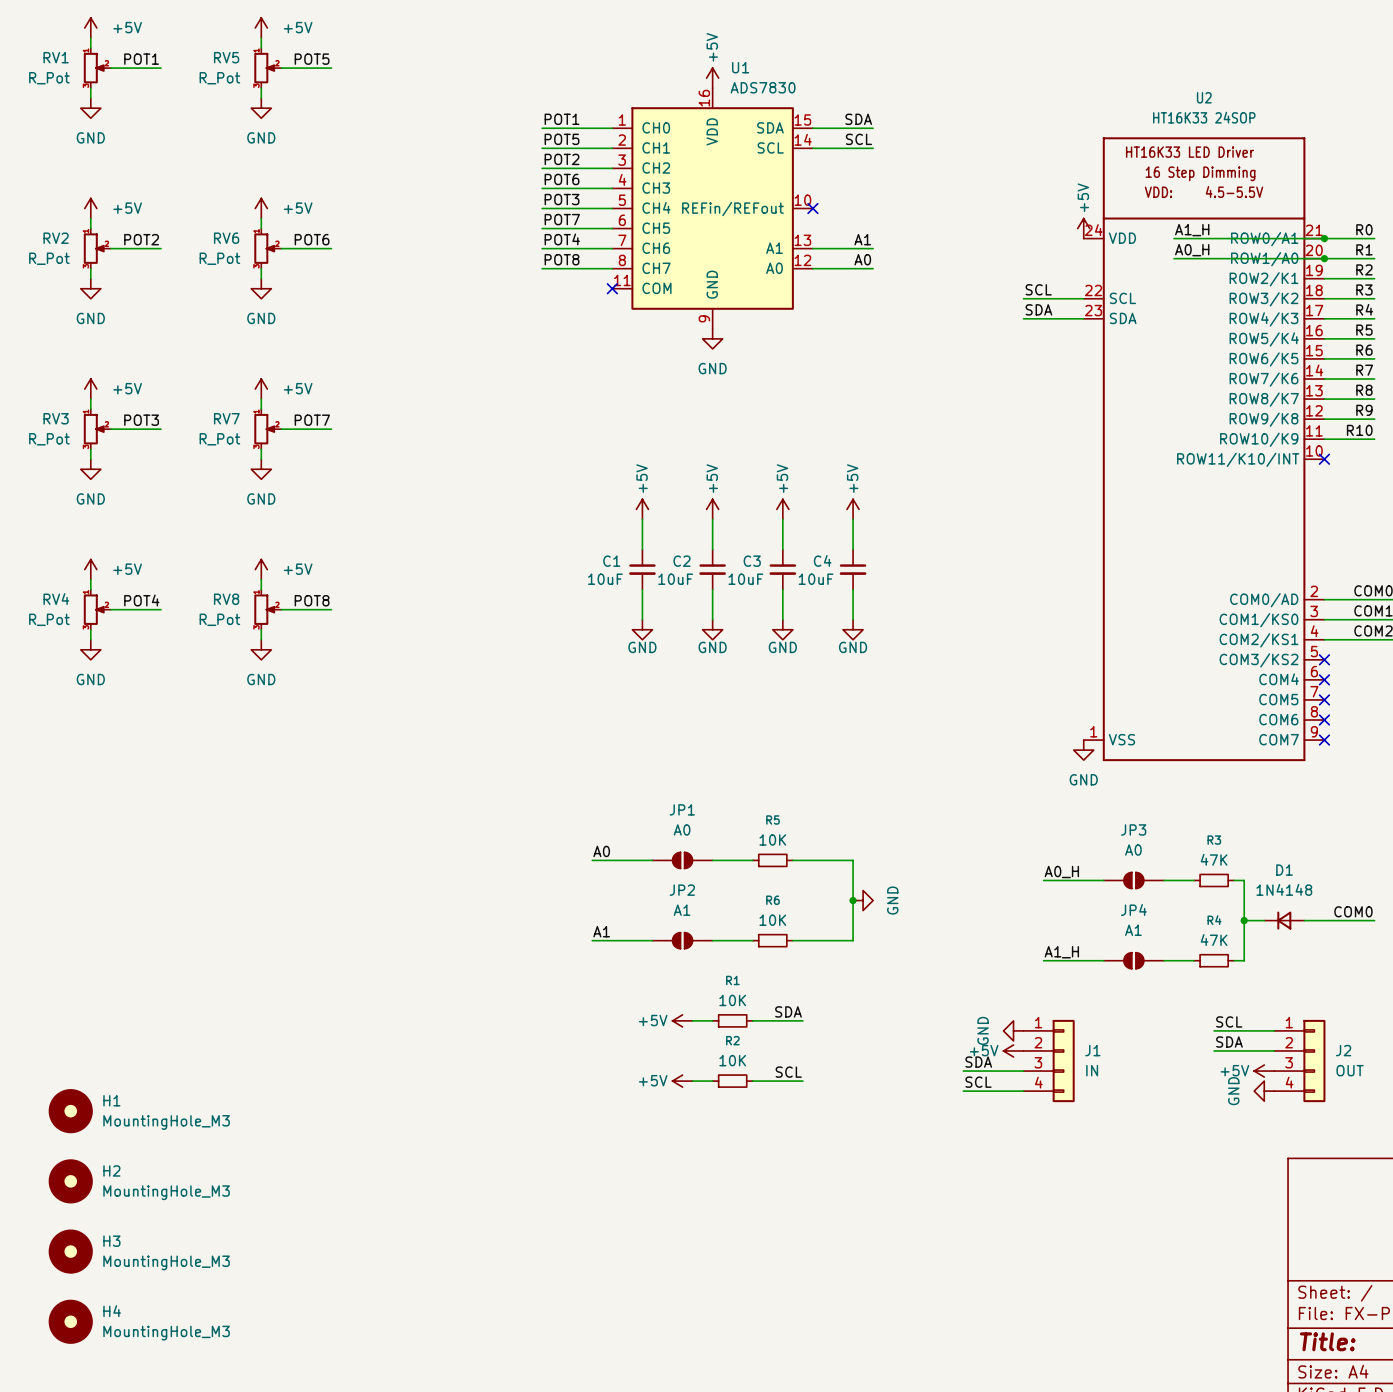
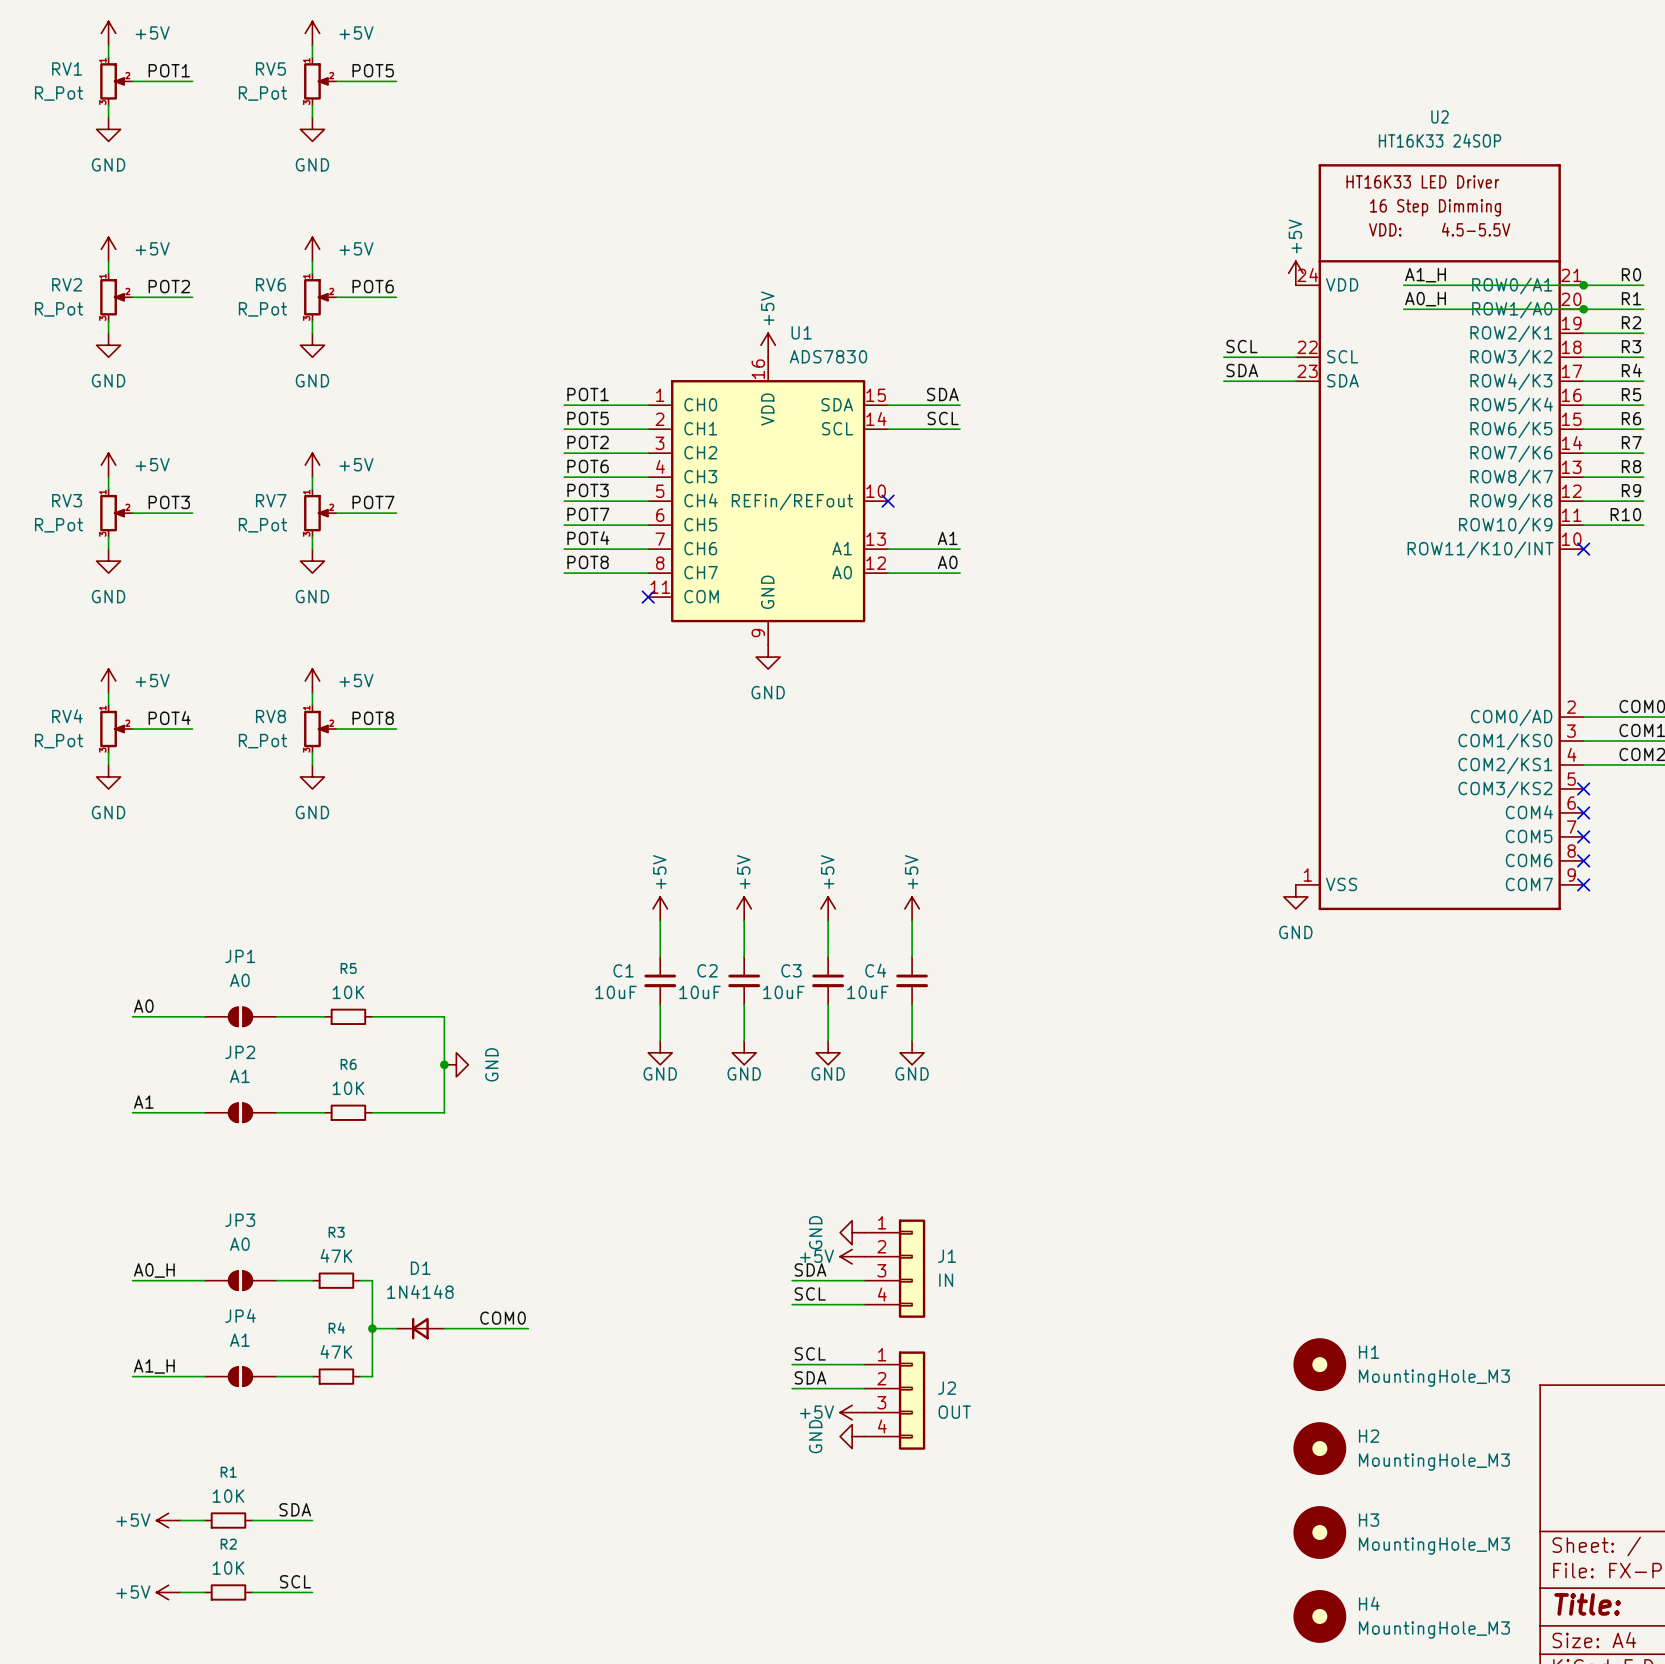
power symbol: +5V (712, 78) -> none
label: POT1 (562, 119) -> none
label: SDA (858, 119) -> none
wire: (542, 128) (612, 128) -> none
wire: (812, 128) (873, 128) -> none
label: POT5 (562, 139) -> none
label: SCL (858, 139) -> none
wire: (542, 148) (612, 148) -> none
wire: (812, 148) (873, 148) -> none
label: POT2 (562, 159) -> none
wire: (542, 168) (612, 168) -> (564, 405) (648, 405)
label: POT6 (562, 179) -> none
wire: (542, 188) (612, 188) -> (564, 429) (648, 429)
label: POT3 (562, 199) -> none
wire: (542, 208) (612, 208) -> (564, 453) (648, 453)
U1 position: (712, 208) -> (768, 501)
no-connect mark: (812, 208) -> none
label: POT7 (562, 219) -> none
wire: (542, 228) (612, 228) -> (564, 477) (648, 477)
label: POT4 (562, 239) -> none
label: A1 (862, 239) -> none
wire: (542, 248) (612, 248) -> (564, 501) (648, 501)
wire: (812, 248) (873, 248) -> (888, 405) (960, 405)
label: POT8 (562, 259) -> none
label: A0 (862, 259) -> none
wire: (542, 268) (612, 268) -> (564, 525) (648, 525)
wire: (812, 268) (873, 268) -> (888, 429) (960, 429)
no-connect mark: (612, 288) -> none
power symbol: none -> +5V (768, 345)
label: none -> POT1 (588, 394)
label: none -> SDA (942, 394)
power symbol: GND (712, 338) -> none
label: none -> POT5 (588, 418)
label: none -> SCL (943, 418)
label: none -> POT2 (588, 442)
label: none -> POT6 (588, 466)
label: none -> POT3 (588, 490)
no-connect mark: none -> (888, 501)
label: none -> POT7 (588, 514)
label: none -> POT4 (588, 538)
label: none -> A1 (947, 538)
wire: none -> (564, 549) (648, 549)
wire: none -> (888, 549) (960, 549)
label: none -> POT8 (588, 562)
label: none -> A0 (947, 562)
wire: none -> (564, 573) (648, 573)
wire: none -> (888, 573) (960, 573)
no-connect mark: none -> (648, 597)
power symbol: +5V (642, 509) -> none
power symbol: +5V (712, 509) -> none
power symbol: +5V (782, 509) -> none
power symbol: +5V (853, 509) -> none
wire: (712, 519) (712, 549) -> none
wire: (782, 519) (782, 549) -> none
wire: (853, 519) (853, 549) -> none
power symbol: none -> GND (768, 657)
C1 position: (642, 569) -> (660, 980)
C2 position: (712, 569) -> (744, 980)
C3 position: (782, 569) -> (828, 980)
C4 position: (853, 569) -> (912, 980)
wire: (642, 589) (642, 619) -> (744, 920) (744, 956)
wire: (712, 589) (712, 619) -> (828, 920) (828, 956)
wire: (782, 589) (782, 619) -> (912, 920) (912, 956)
wire: (853, 589) (853, 619) -> none
power symbol: GND (642, 629) -> none
power symbol: GND (712, 629) -> none
power symbol: GND (782, 629) -> none
power symbol: GND (853, 629) -> none
power symbol: none -> +5V (660, 908)
power symbol: none -> +5V (744, 908)
power symbol: none -> +5V (828, 908)
power symbol: none -> +5V (912, 908)
wire: none -> (660, 920) (660, 956)
wire: none -> (660, 1004) (660, 1040)
wire: none -> (744, 1004) (744, 1040)
wire: none -> (828, 1004) (828, 1040)
wire: none -> (912, 1004) (912, 1040)
label: none -> A0 (143, 1006)
wire: none -> (132, 1016) (204, 1016)
wire: none -> (276, 1016) (324, 1016)
wire: none -> (372, 1016) (444, 1016) (444, 1112) (372, 1112)
label: A0 (601, 851) -> none
wire: (592, 860) (652, 860) -> none
JP1 position: (682, 860) -> (240, 1016)
wire: (712, 860) (752, 860) -> none
R5 position: (772, 860) -> (348, 1016)
wire: (792, 860) (853, 860) (853, 940) (792, 940) -> none
label: A0_H (1061, 872) -> none
power symbol: none -> GND (660, 1052)
power symbol: none -> GND (744, 1052)
power symbol: none -> GND (828, 1052)
power symbol: none -> GND (912, 1052)
wire: (1043, 880) (1103, 880) -> none
JP3 position: (1133, 880) -> (240, 1280)
wire: (1163, 880) (1194, 880) -> none
R3 position: (1214, 880) -> (336, 1280)
wire: (1234, 880) (1244, 880) (1244, 960) (1234, 960) -> none
junction: none -> (444, 1064)
power symbol: none -> GND (456, 1064)
junction: (853, 900) -> none
power symbol: GND (863, 900) -> none
label: COM0 (1353, 911) -> none
wire: (1244, 920) (1264, 920) -> none
junction: (1244, 920) -> none
D1 position: (1284, 920) -> (420, 1328)
wire: (1304, 920) (1374, 920) -> none
label: none -> A1 (143, 1102)
wire: none -> (132, 1112) (204, 1112)
wire: none -> (276, 1112) (324, 1112)
label: A1 (601, 931) -> none
wire: (592, 940) (652, 940) -> (792, 1280) (864, 1280)
JP2 position: (682, 940) -> (240, 1112)
wire: (712, 940) (752, 940) -> none
R6 position: (772, 940) -> (348, 1112)
label: A1_H (1061, 952) -> none
wire: (1043, 960) (1103, 960) -> none
JP4 position: (1133, 960) -> (240, 1376)
wire: (1163, 960) (1194, 960) -> none
R4 position: (1214, 960) -> (336, 1376)
label: SDA (788, 1011) -> none
power symbol: +5V (682, 1020) -> none
wire: (692, 1020) (712, 1020) -> none
R1 position: (732, 1020) -> (228, 1520)
wire: (752, 1020) (802, 1020) -> none
label: SCL (1229, 1021) -> none
power symbol: none -> GND (852, 1232)
power symbol: GND (1013, 1030) -> none
wire: (1214, 1030) (1274, 1030) -> none
label: SDA (1229, 1042) -> none
power symbol: none -> +5V (852, 1256)
power symbol: +5V (1013, 1050) -> none
wire: (1214, 1050) (1274, 1050) -> none
J1 position: (1049, 1061) -> (894, 1268)
J2 position: (1299, 1061) -> (894, 1400)
label: none -> A0_H (154, 1270)
label: none -> SDA (810, 1269)
label: SDA (978, 1062) -> none
wire: none -> (132, 1280) (204, 1280)
wire: none -> (276, 1280) (312, 1280)
wire: none -> (360, 1280) (372, 1280) (372, 1376) (360, 1376)
wire: (963, 1071) (1023, 1071) -> none
power symbol: +5V (1264, 1071) -> none
label: SCL (788, 1072) -> none
power symbol: +5V (682, 1081) -> none
wire: (692, 1081) (712, 1081) -> none
R2 position: (732, 1081) -> (228, 1592)
wire: (752, 1081) (802, 1081) -> none
label: none -> SCL (810, 1293)
label: SCL (978, 1082) -> none
wire: none -> (792, 1304) (864, 1304)
wire: (963, 1091) (1023, 1091) -> none
power symbol: GND (1264, 1091) -> none
label: none -> COM0 (503, 1318)
H1 position: (70, 1111) -> (1319, 1364)
wire: none -> (372, 1328) (396, 1328)
junction: none -> (372, 1328)
wire: none -> (444, 1328) (528, 1328)
label: none -> SCL (810, 1353)
wire: none -> (792, 1364) (864, 1364)
label: none -> A1_H (154, 1366)
wire: none -> (132, 1376) (204, 1376)
wire: none -> (276, 1376) (312, 1376)
label: none -> SDA (810, 1377)
wire: none -> (792, 1388) (864, 1388)
H2 position: (70, 1181) -> (1319, 1448)
power symbol: none -> +5V (852, 1412)
power symbol: none -> GND (852, 1436)
H3 position: (70, 1251) -> (1319, 1532)
label: none -> SDA (295, 1509)
power symbol: none -> +5V (168, 1520)
wire: none -> (180, 1520) (204, 1520)
wire: none -> (252, 1520) (312, 1520)
H4 position: (70, 1321) -> (1319, 1616)
label: none -> SCL (295, 1581)
power symbol: none -> +5V (168, 1592)
wire: none -> (180, 1592) (204, 1592)
wire: none -> (252, 1592) (312, 1592)

